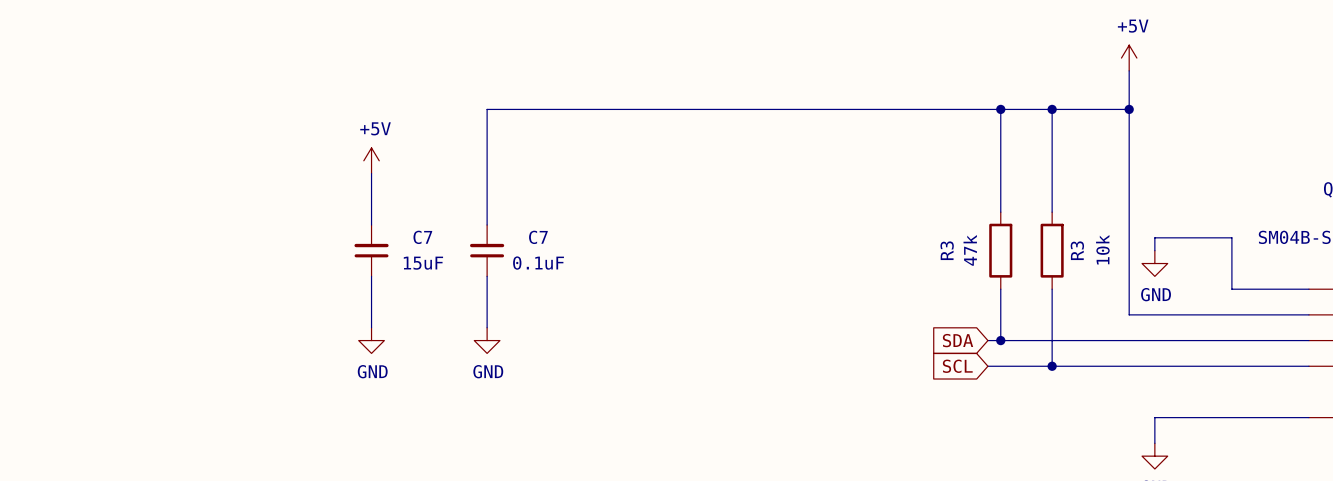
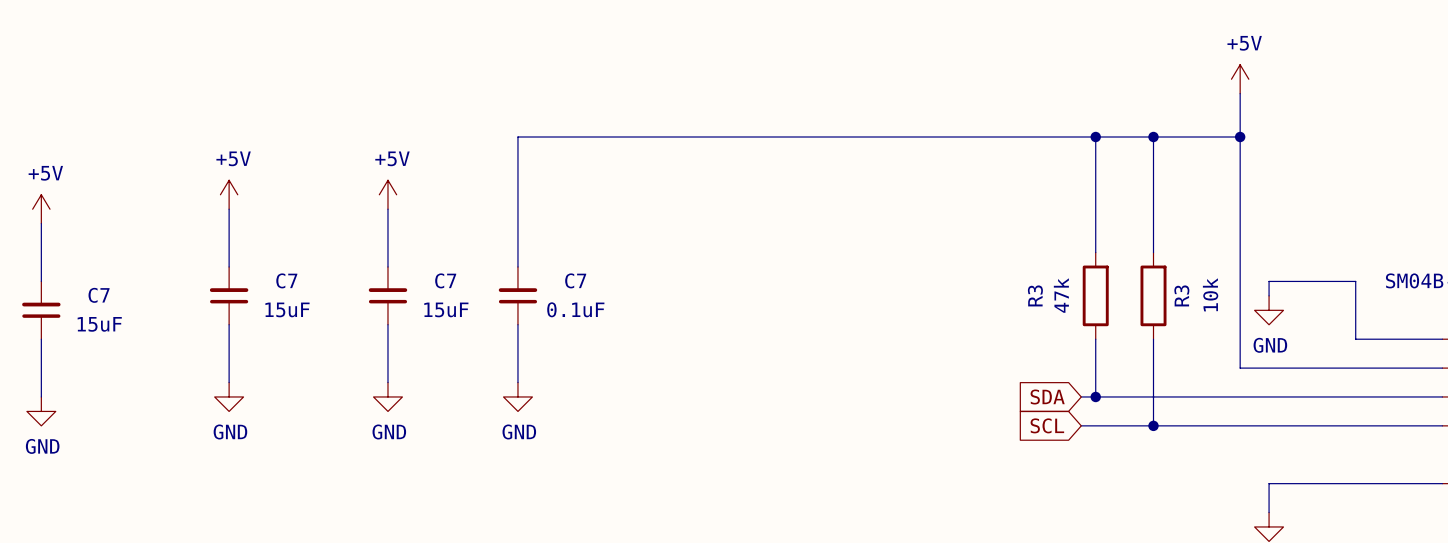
power symbol: none -> +5V (229, 194)
power symbol: none -> +5V (41, 209)
wire: none -> (229, 209) (229, 266)
wire: none -> (41, 223) (41, 281)
C7: none -> 15uF (229, 295)
C7: none -> 15uF (41, 310)
wire: none -> (229, 324) (229, 382)
wire: none -> (41, 339) (41, 396)
power symbol: none -> GND (229, 396)
power symbol: none -> GND (41, 411)

